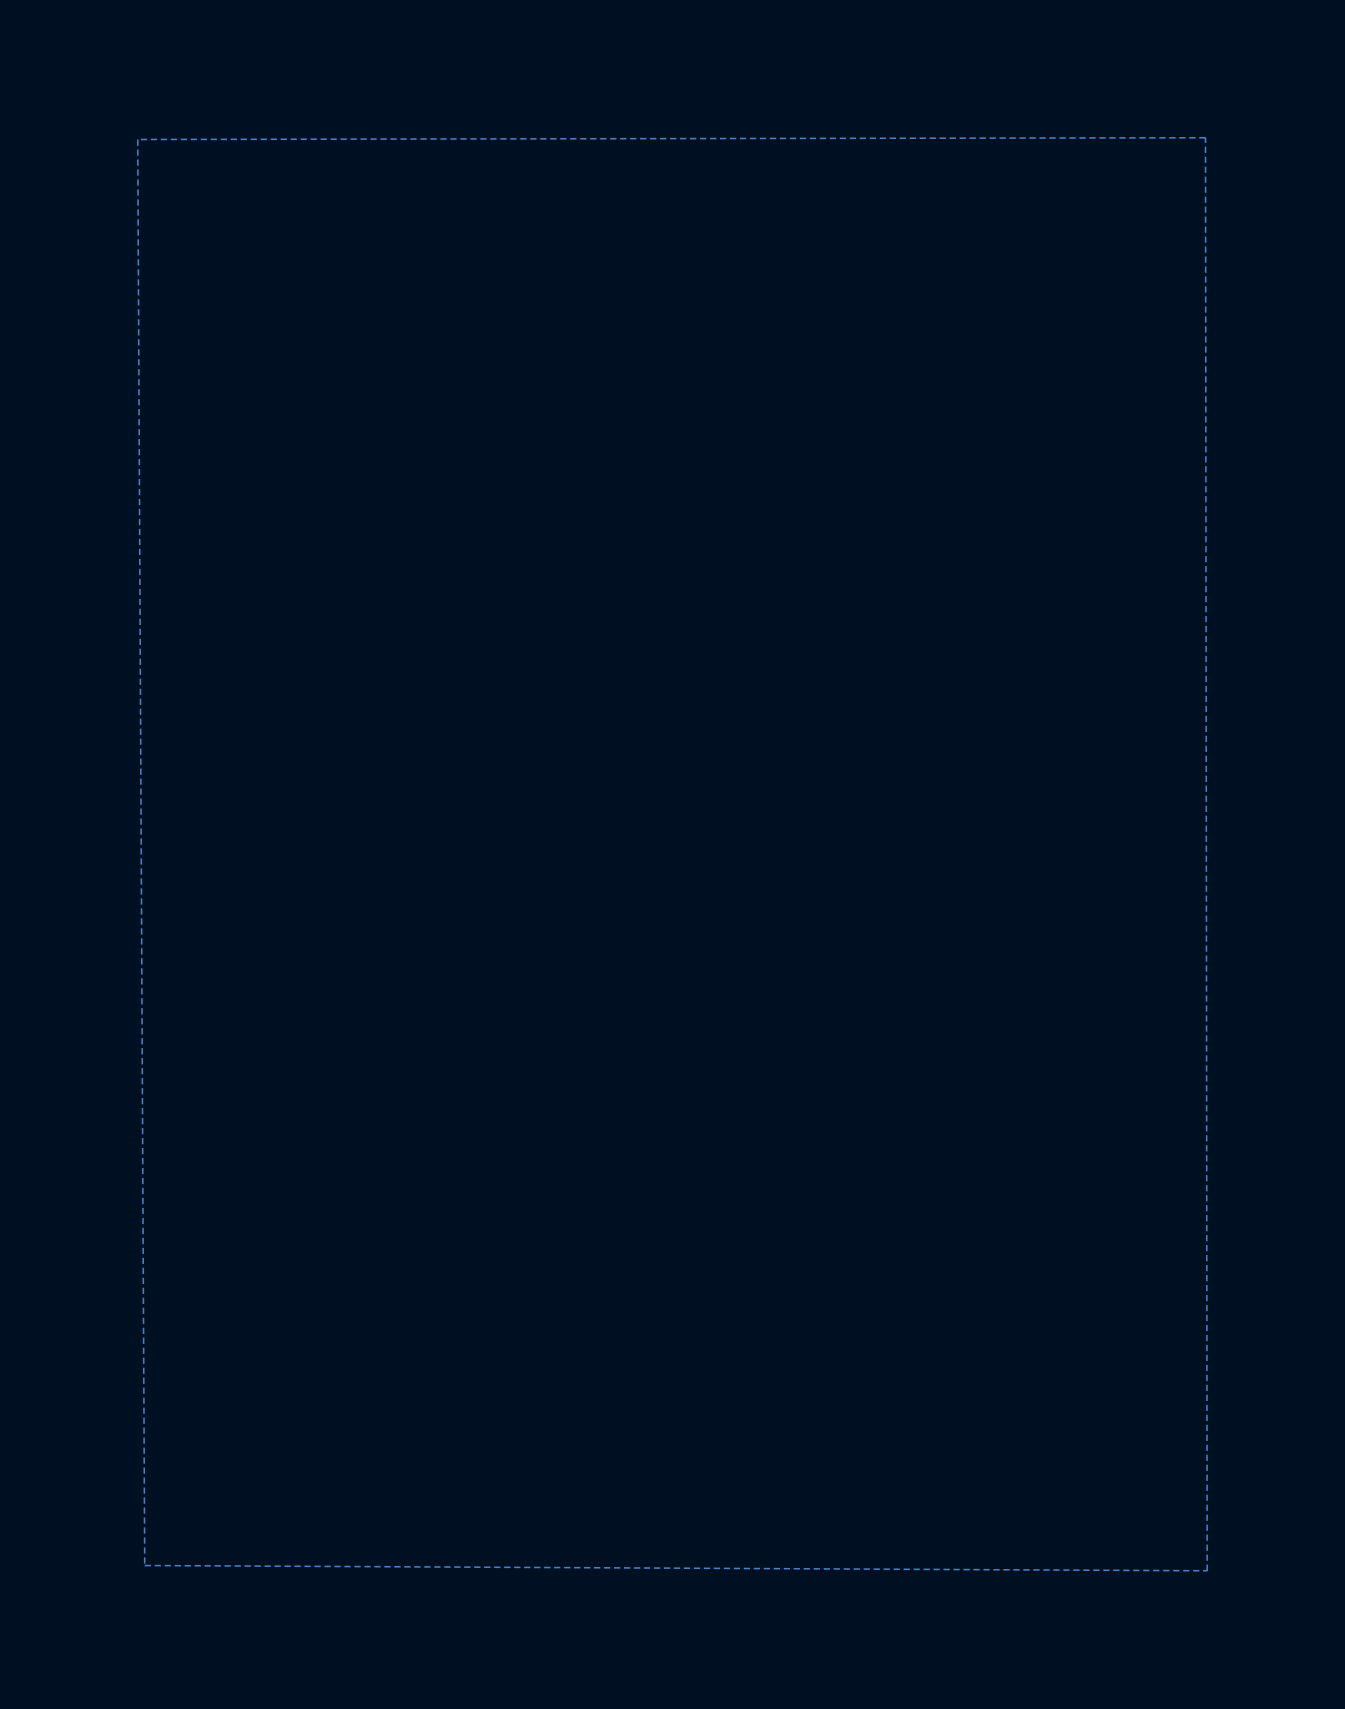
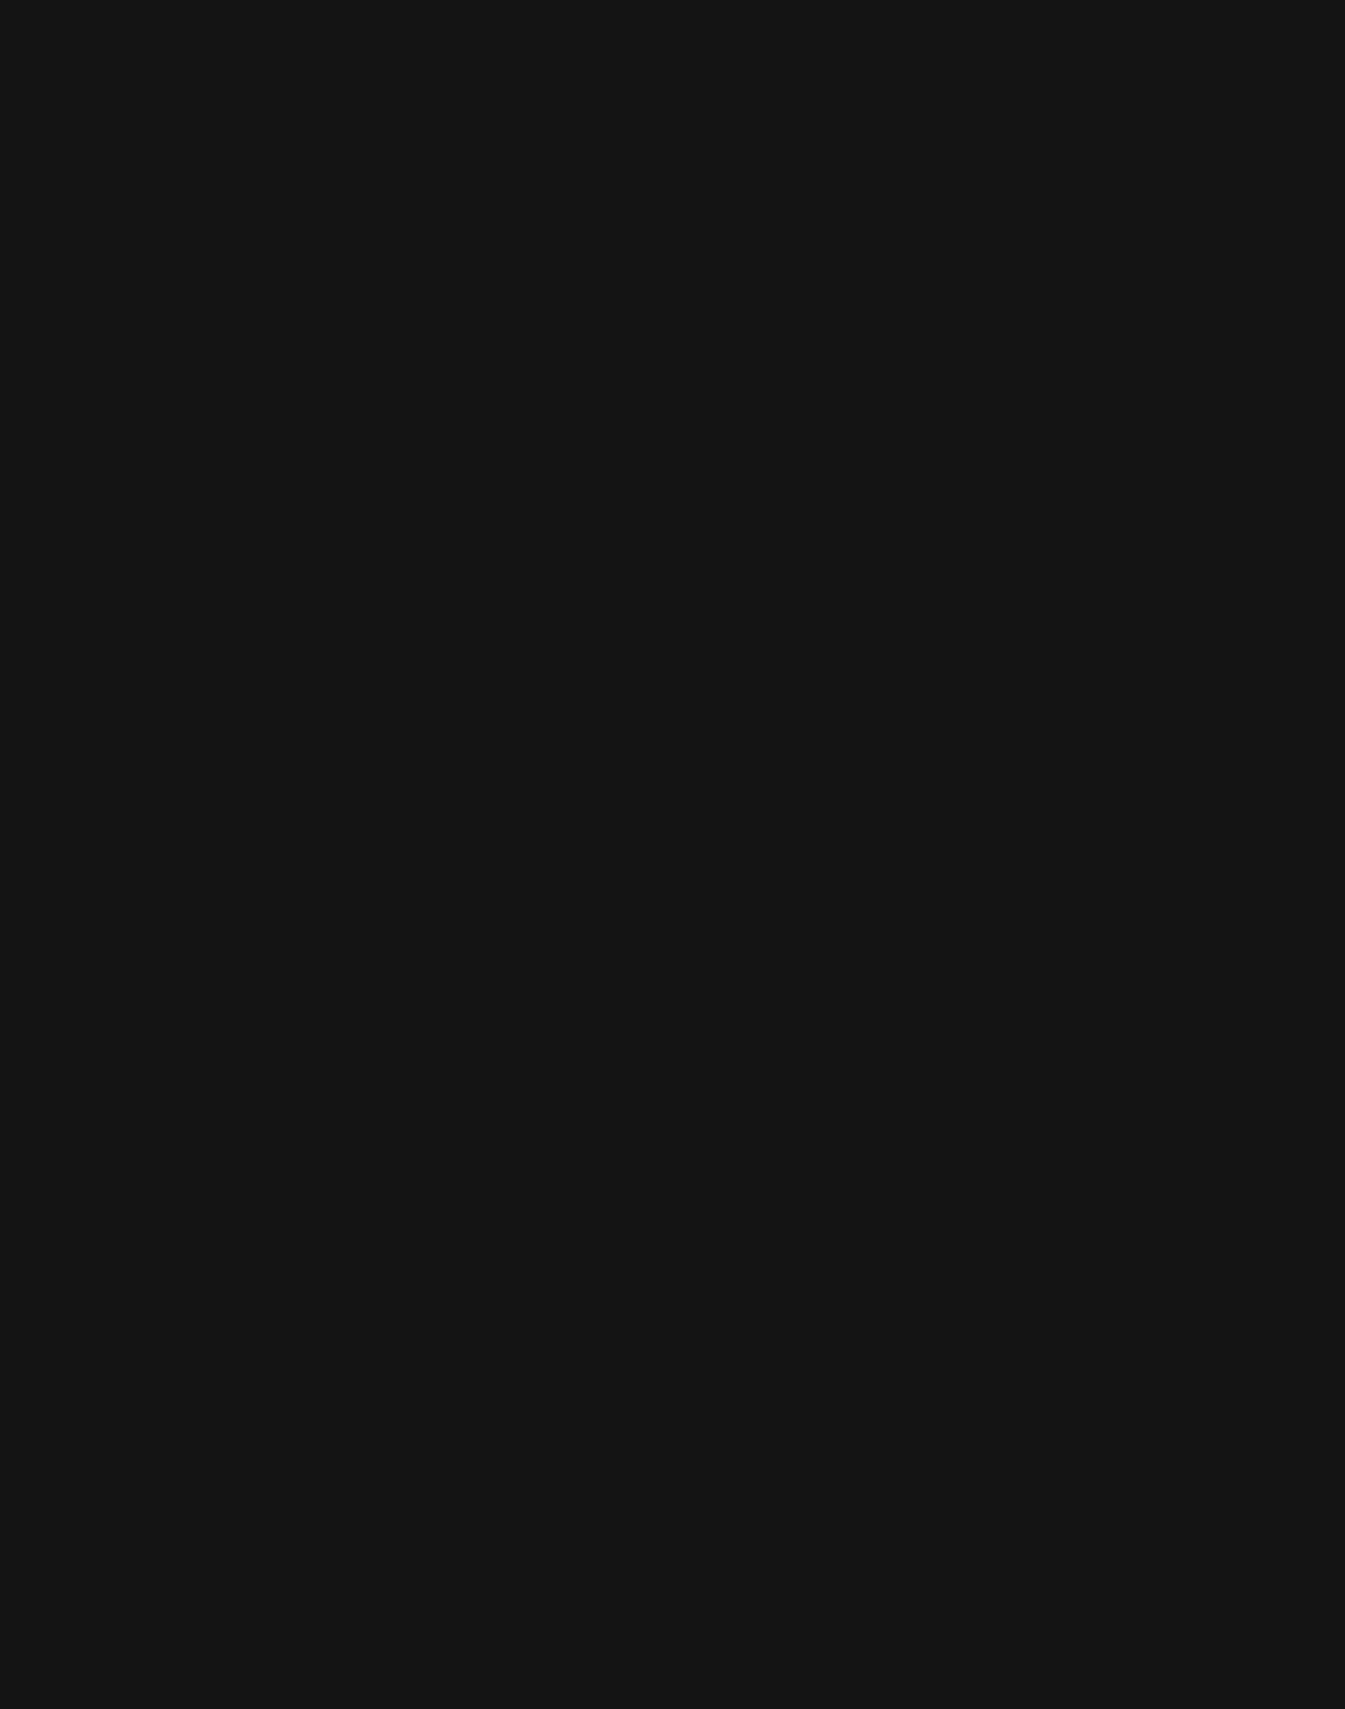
zone outline: (1205, 137) (137, 139) (144, 1565) (1207, 1570) (1205, 138) -> none

